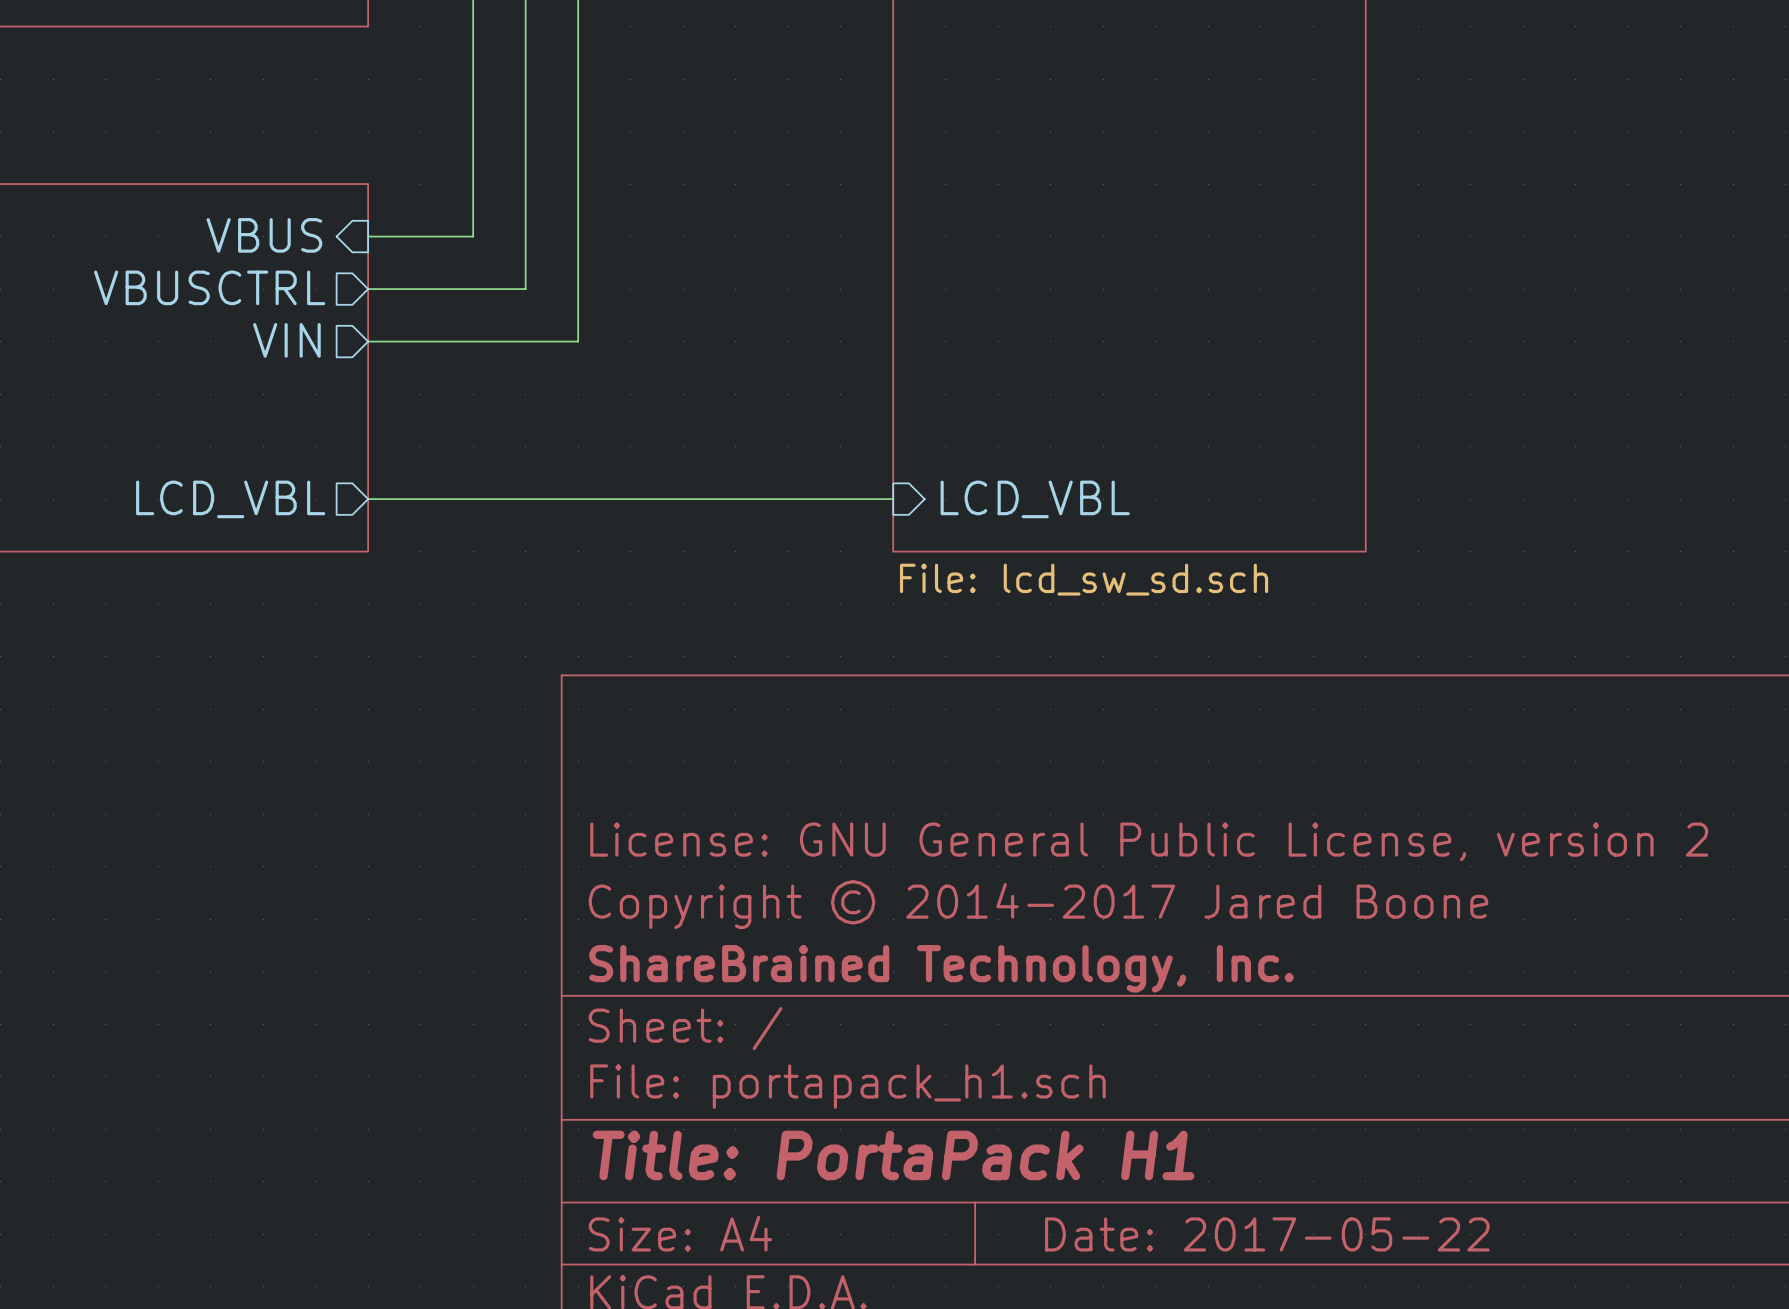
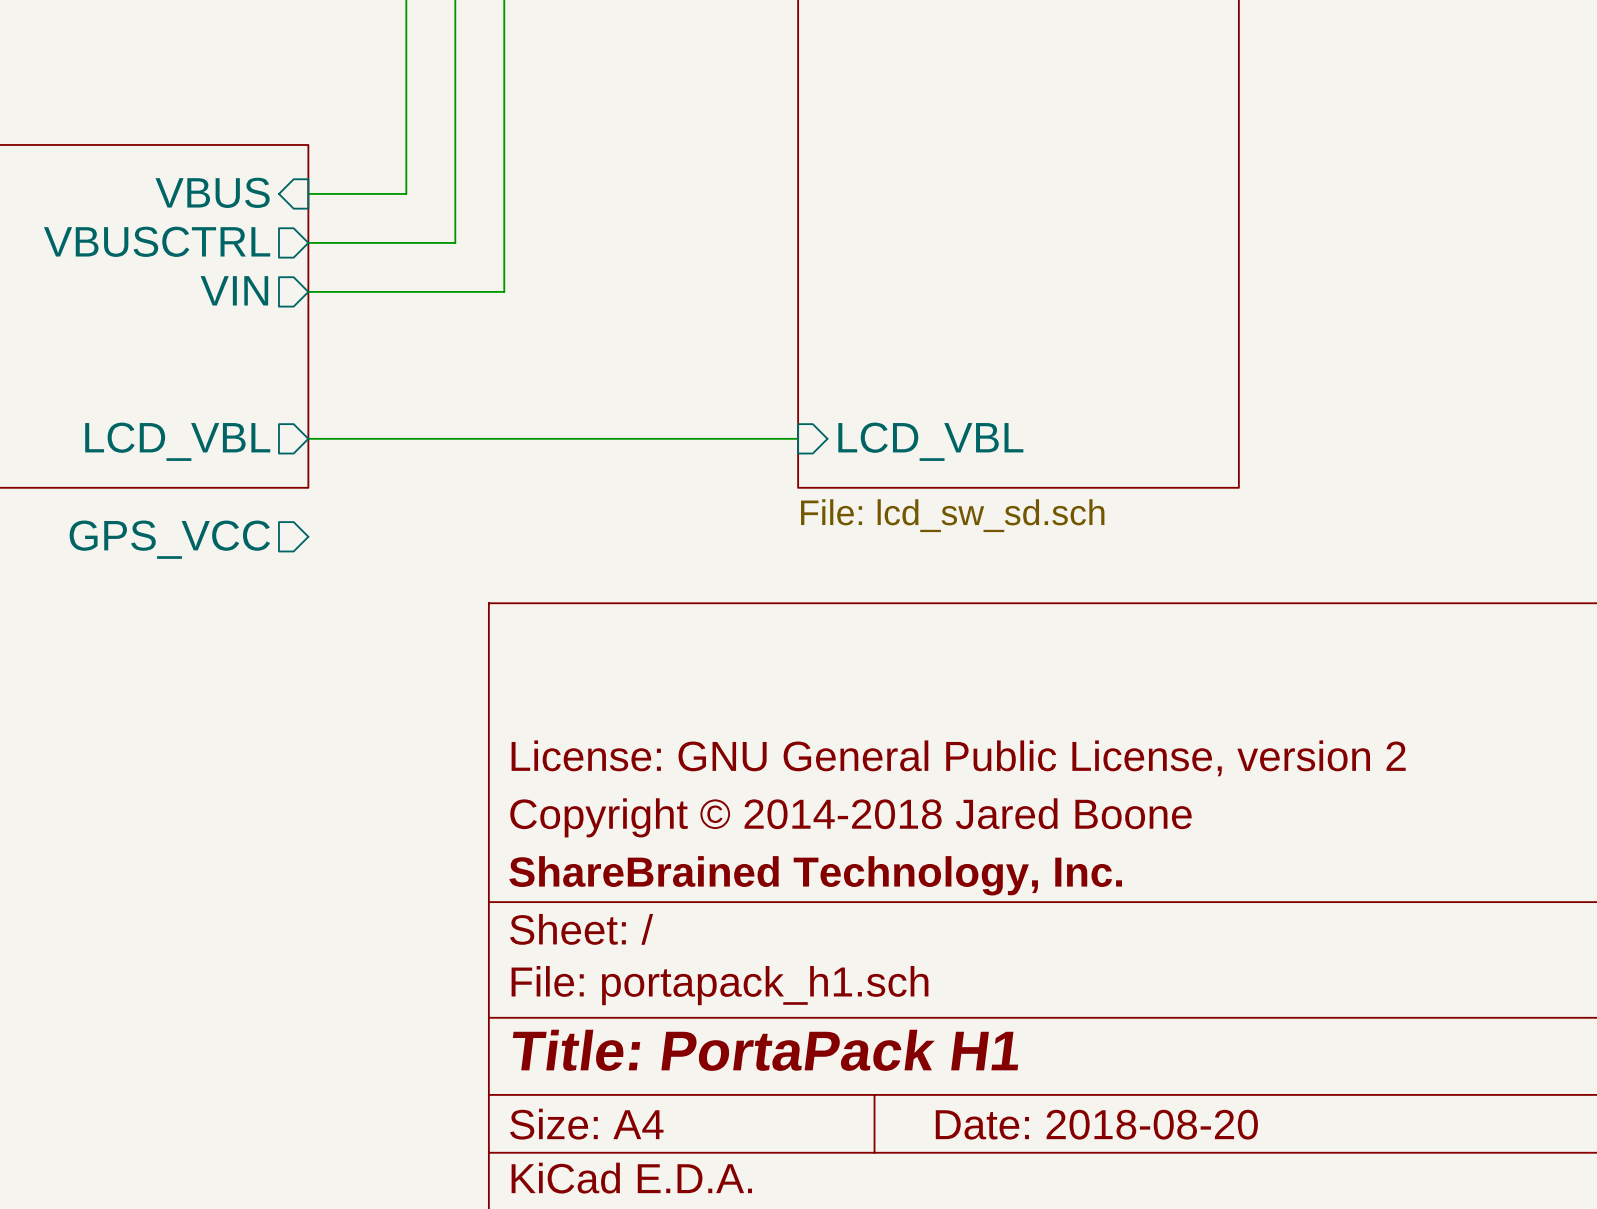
sheet pin: none -> GPS_VCC (169, 539)
title block: Copyright © 2014-2017 Jared Boone (1038, 904) -> Copyright © 2014-2018 Jared Boone (850, 817)
title block: Date: 2017-05-22 (1267, 1234) -> Date: 2018-08-20 (1096, 1124)

